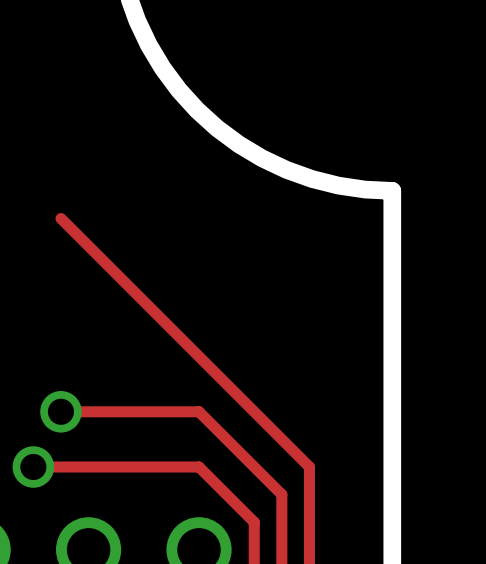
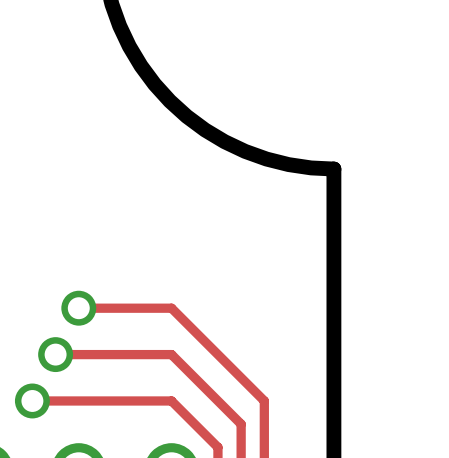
track: (60, 218) (199, 356) -> (78, 308) (171, 308)
via: none -> (78, 308)

